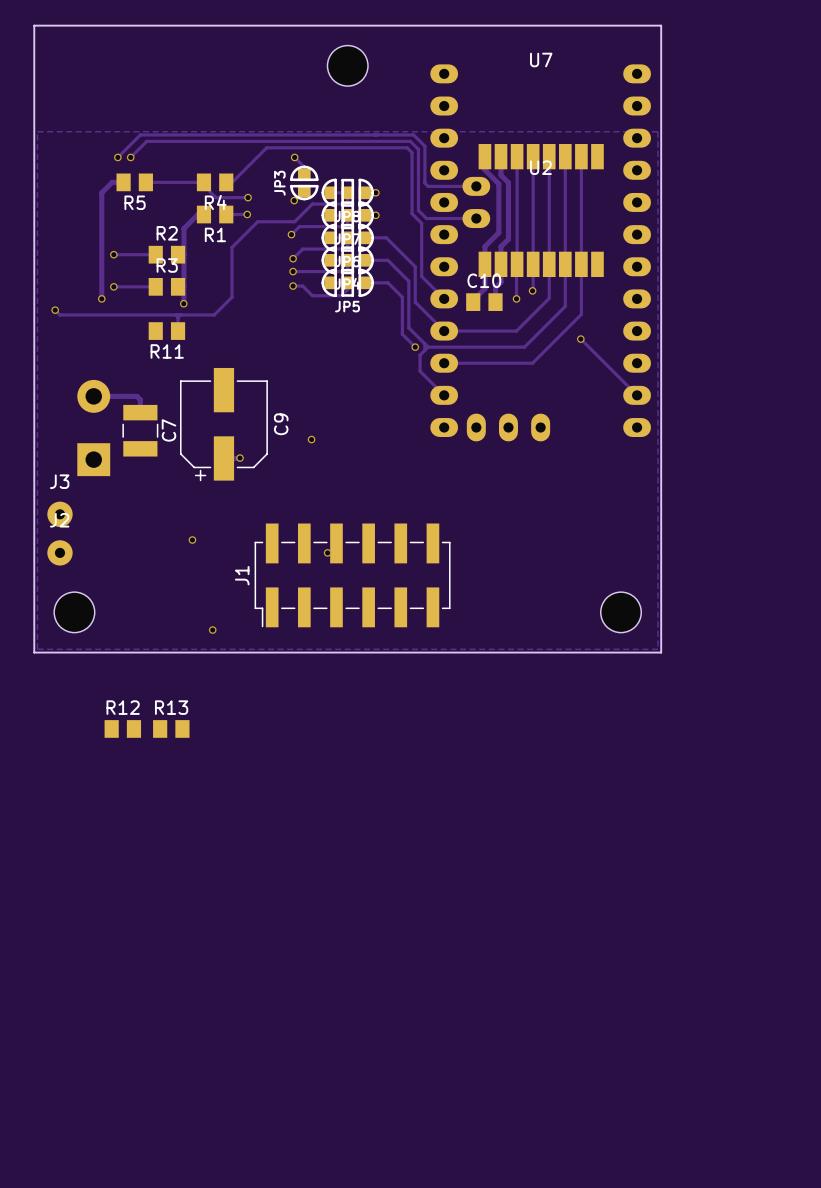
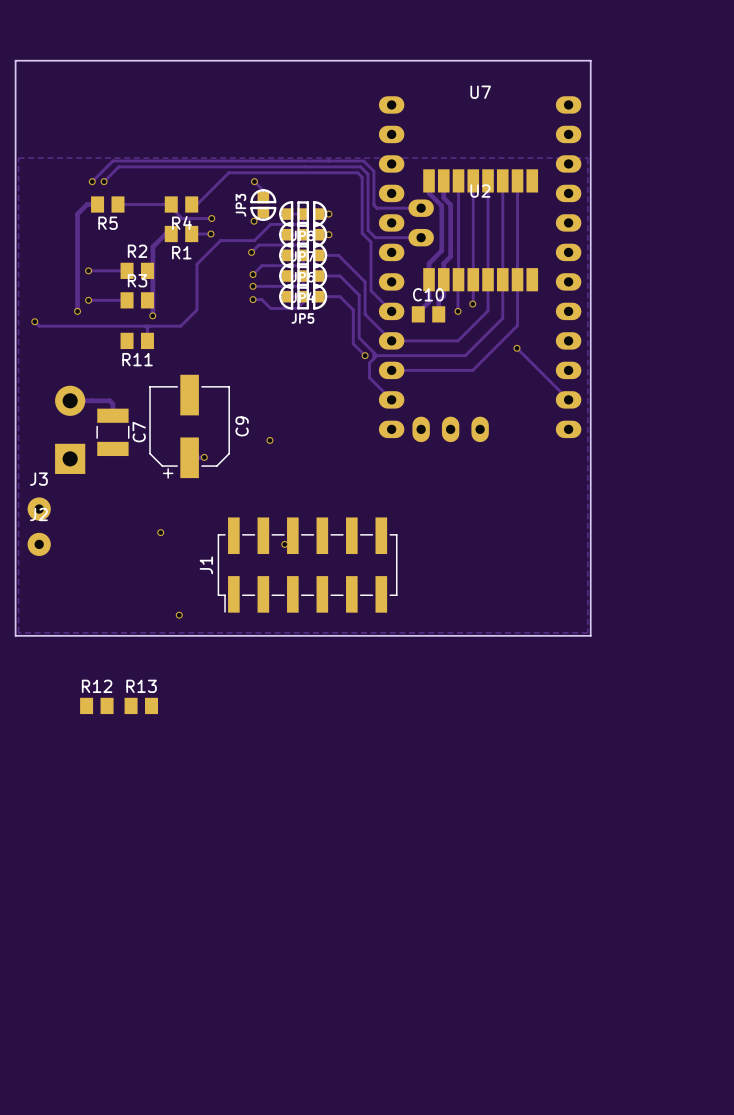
part: (347, 65) -> none
part: (74, 612) -> none
part: (621, 612) -> none

